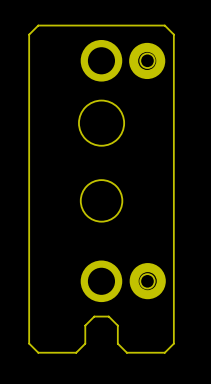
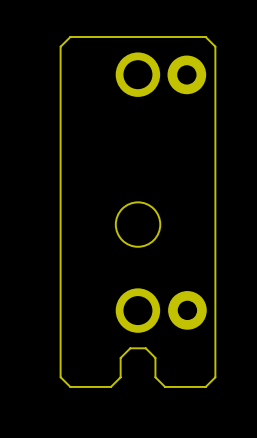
round board edge: [139, 52, 156, 69] -> none
round board edge: [78, 99, 126, 147] -> none
round board edge: [139, 273, 156, 290] -> none

